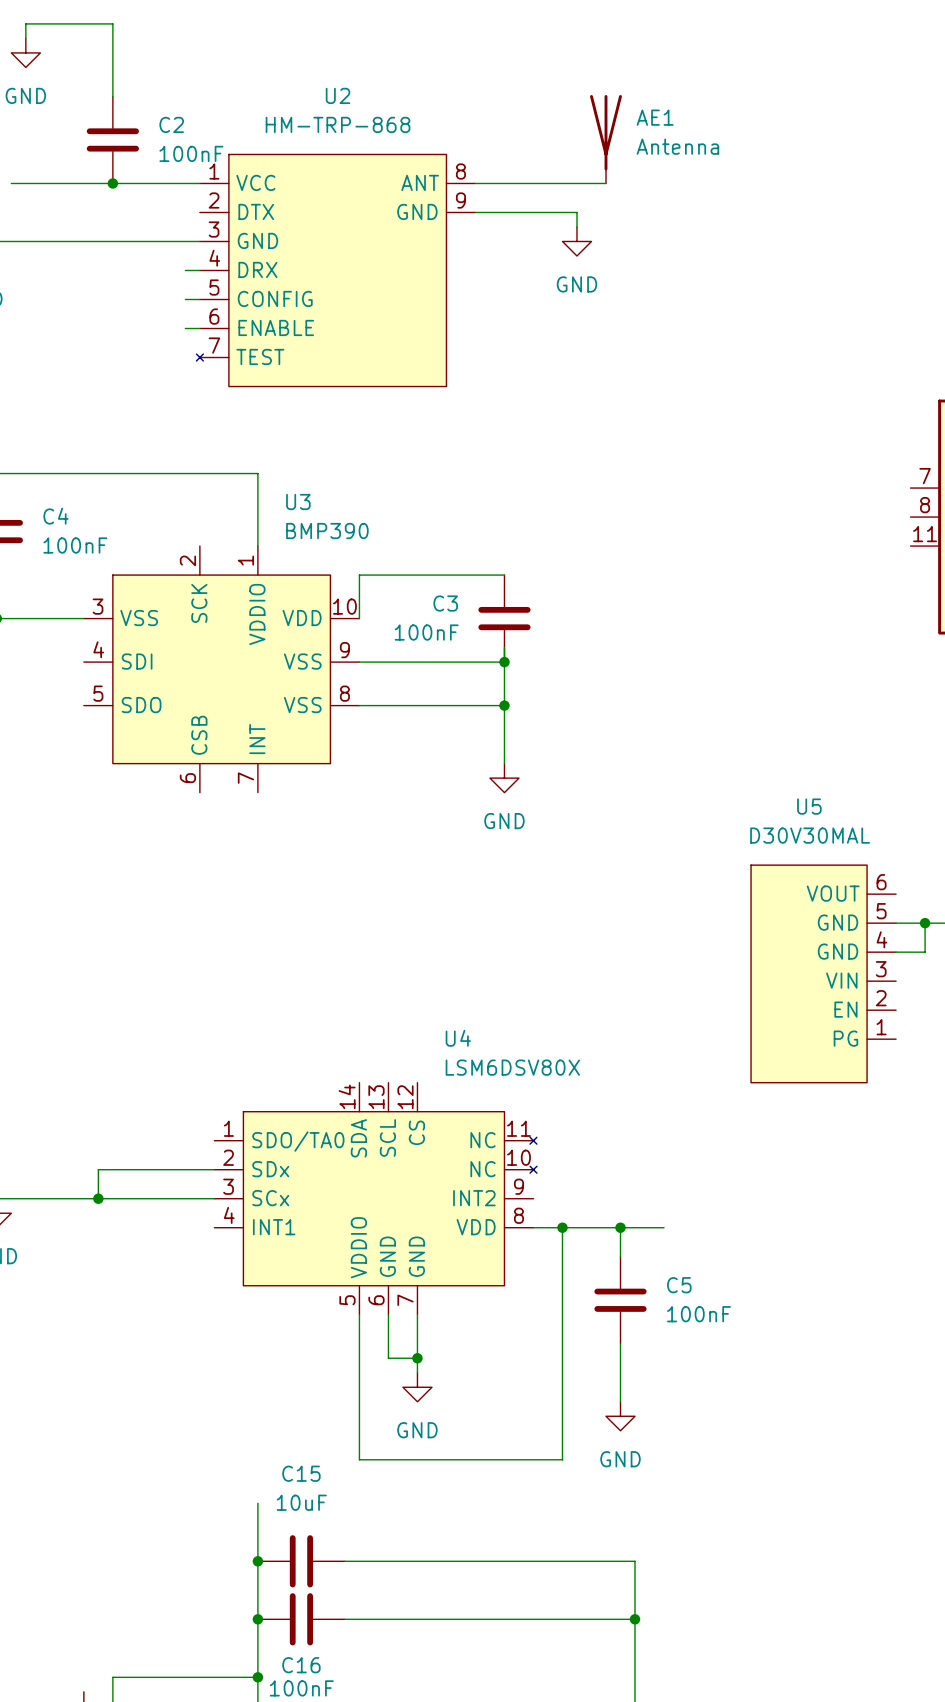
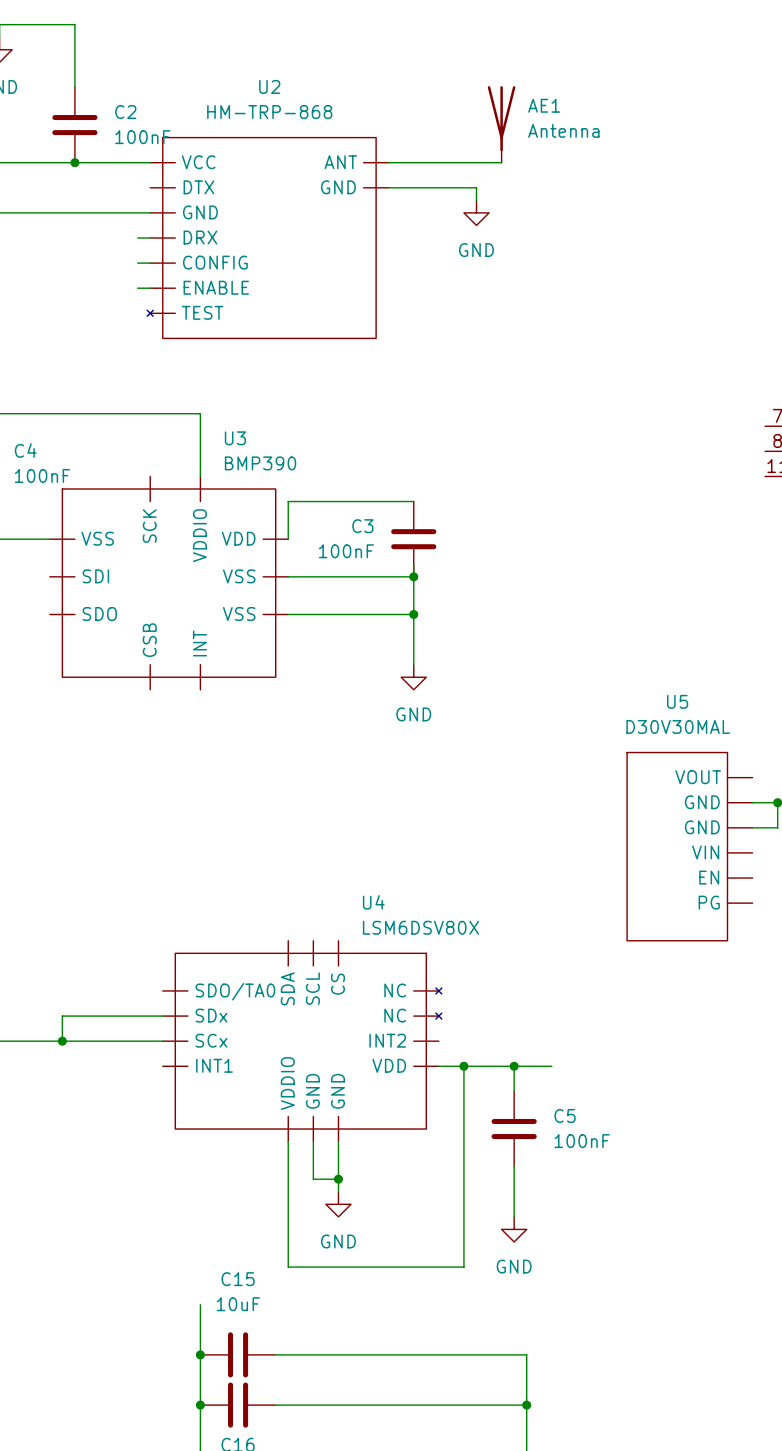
U2 symbol: [196, 154, 476, 387] -> [147, 137, 389, 339]
U3 symbol: [83, 546, 360, 793] -> [49, 476, 289, 690]
U5 symbol: [751, 865, 897, 1083] -> [627, 752, 753, 941]
U4 symbol: [214, 1082, 537, 1315] -> [162, 940, 442, 1142]

